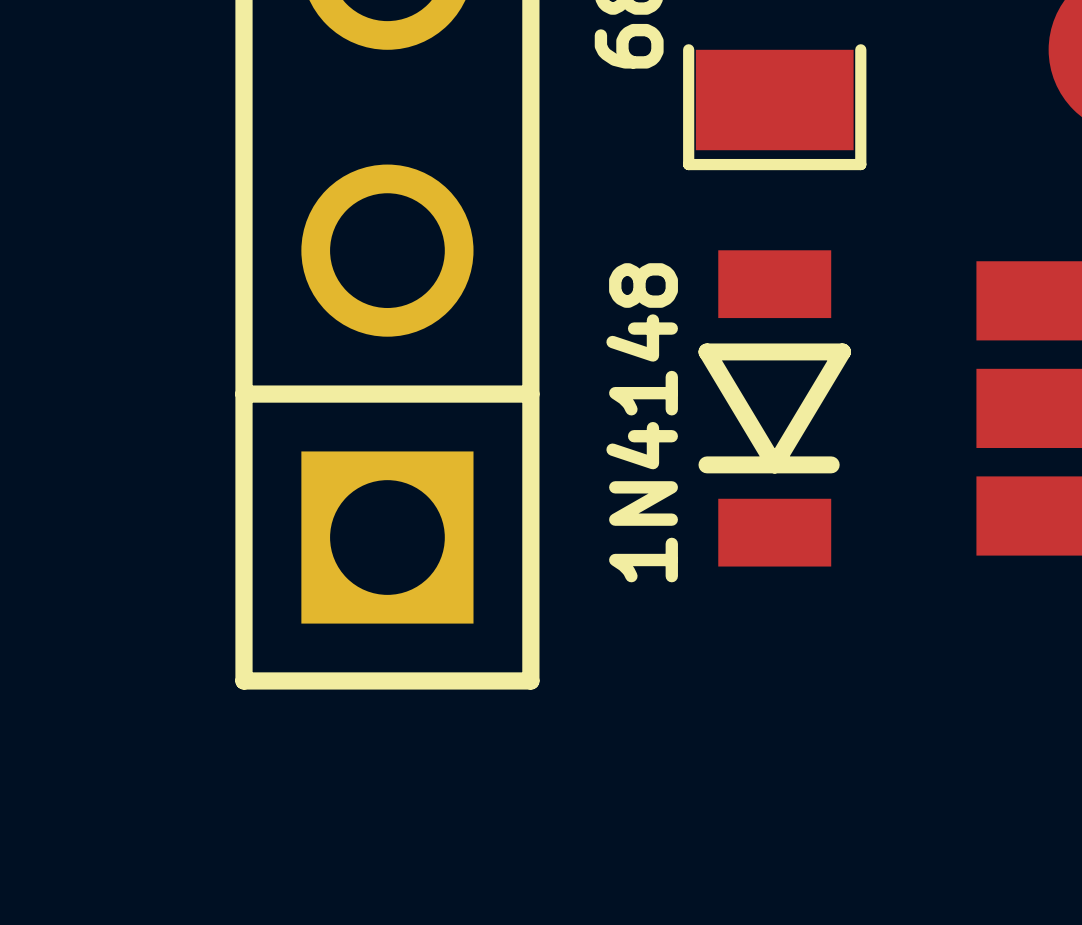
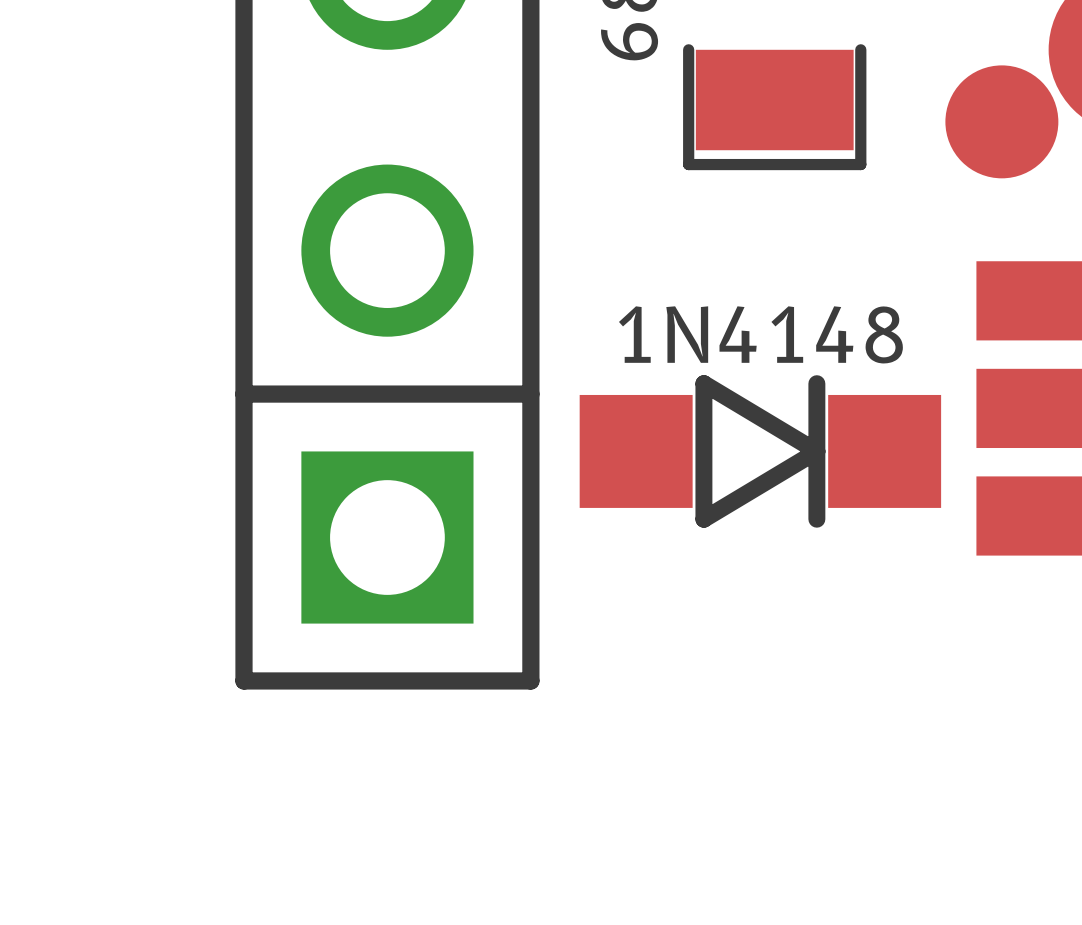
part: none -> (1001, 121)
part footprint: [698, 250, 851, 567] -> [579, 375, 942, 528]

